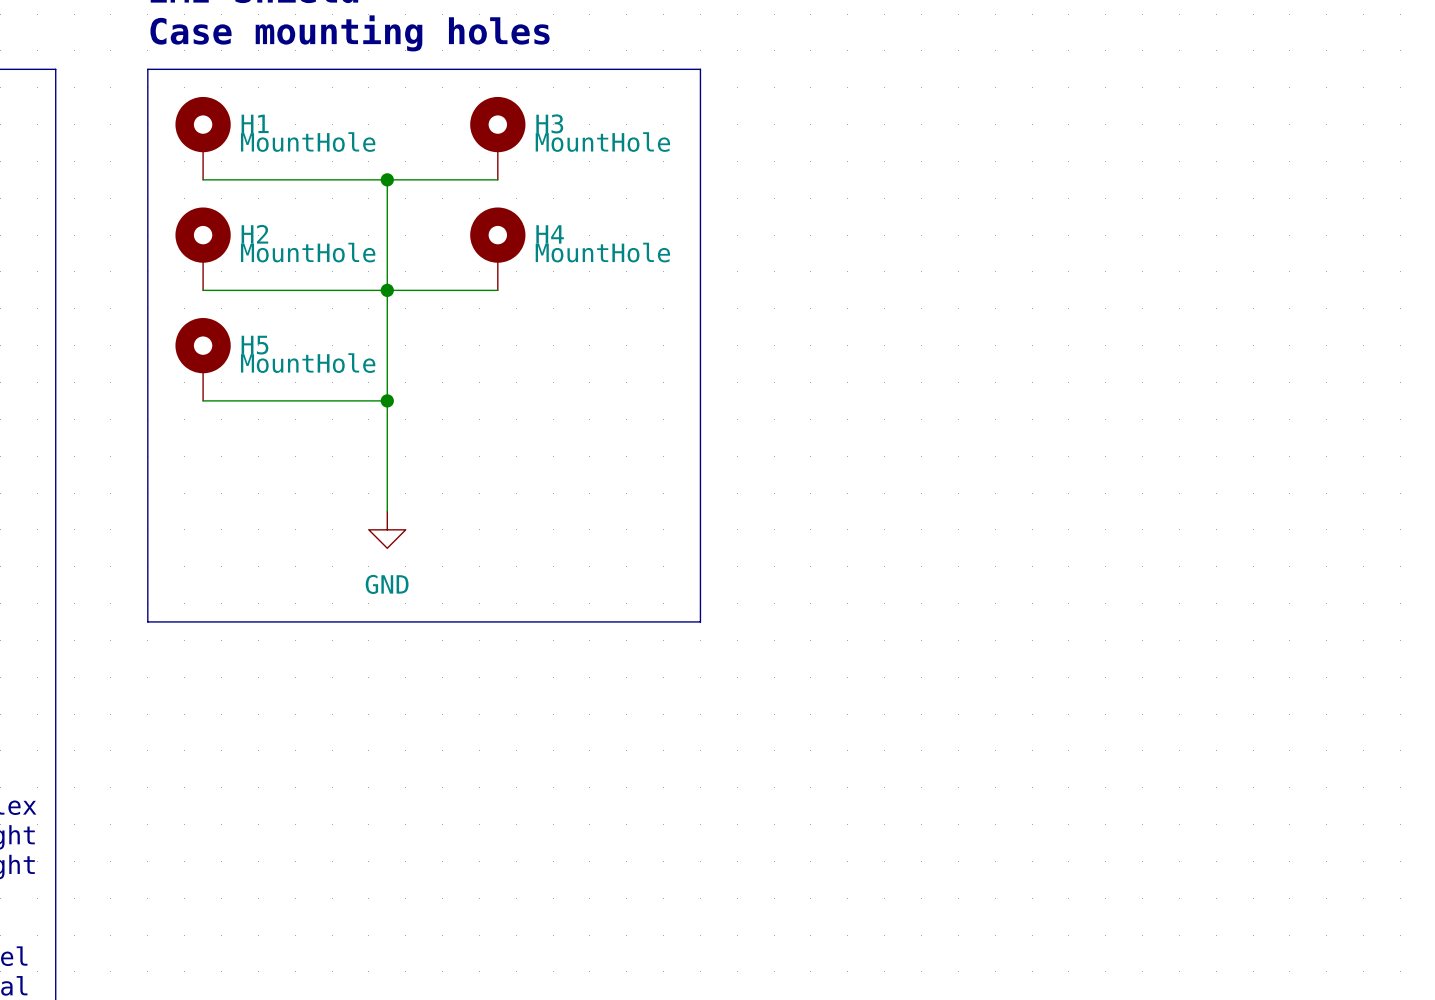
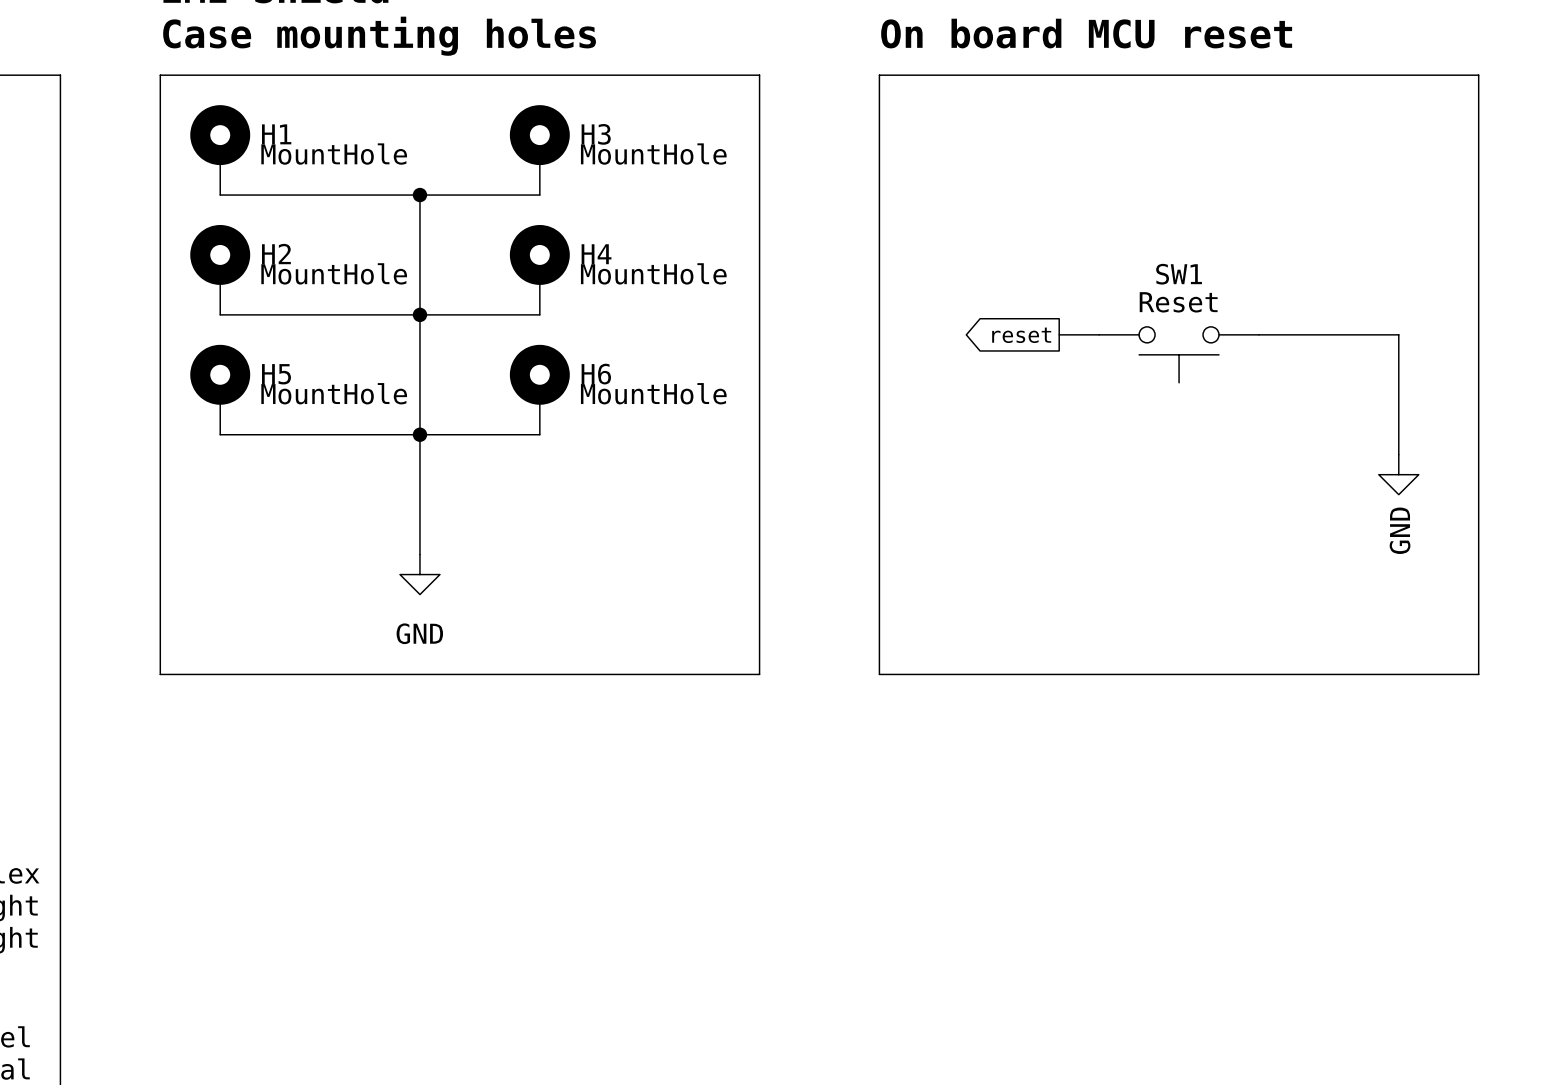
text: none -> On board MCU reset (1086, 33)
line: none -> (879, 75) (1478, 75) (1478, 674) (879, 674) (879, 75)
wire: none -> (1059, 334) (1099, 334)
wire: none -> (1258, 334) (1398, 334) (1398, 454)
global label: none -> reset (1021, 335)
SW1: none -> Reset (1179, 354)
H6: none -> MountHole (539, 389)
wire: none -> (419, 434) (539, 434)
power symbol: none -> GND (1398, 474)

